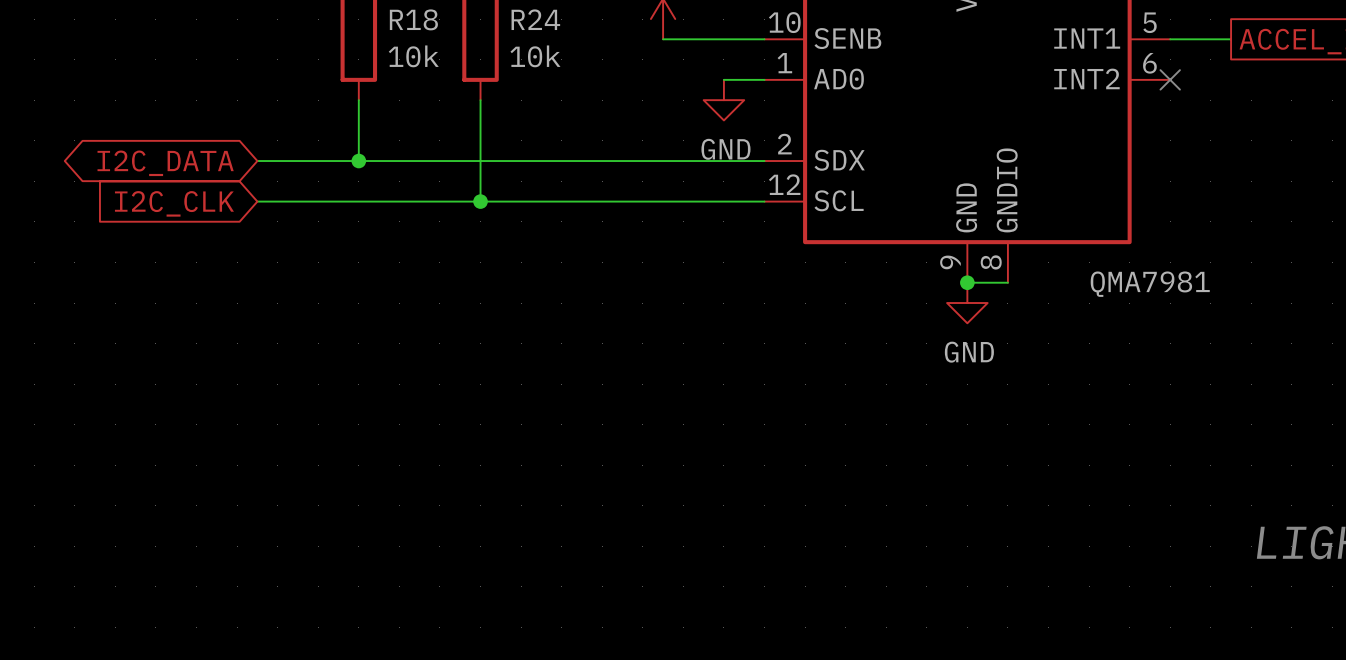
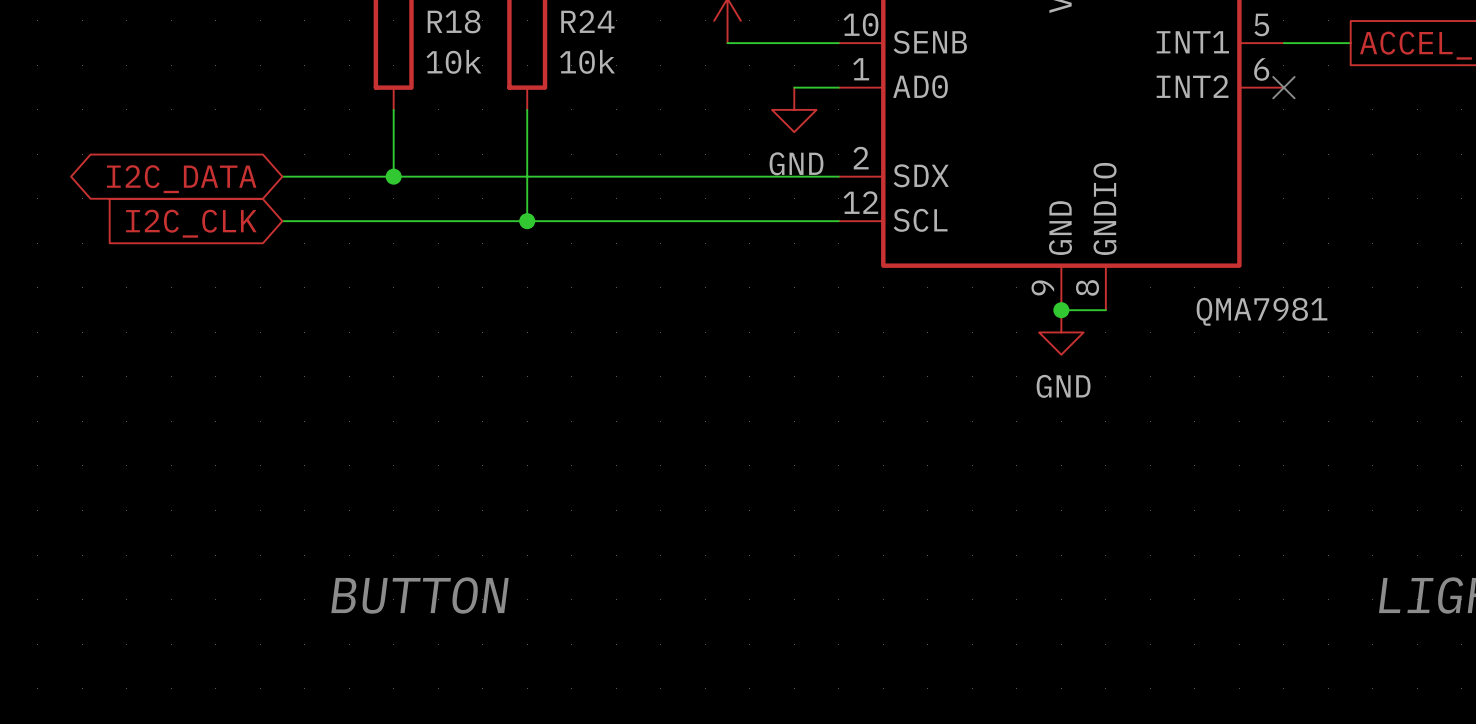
text: none -> BUTTON (420, 595)

